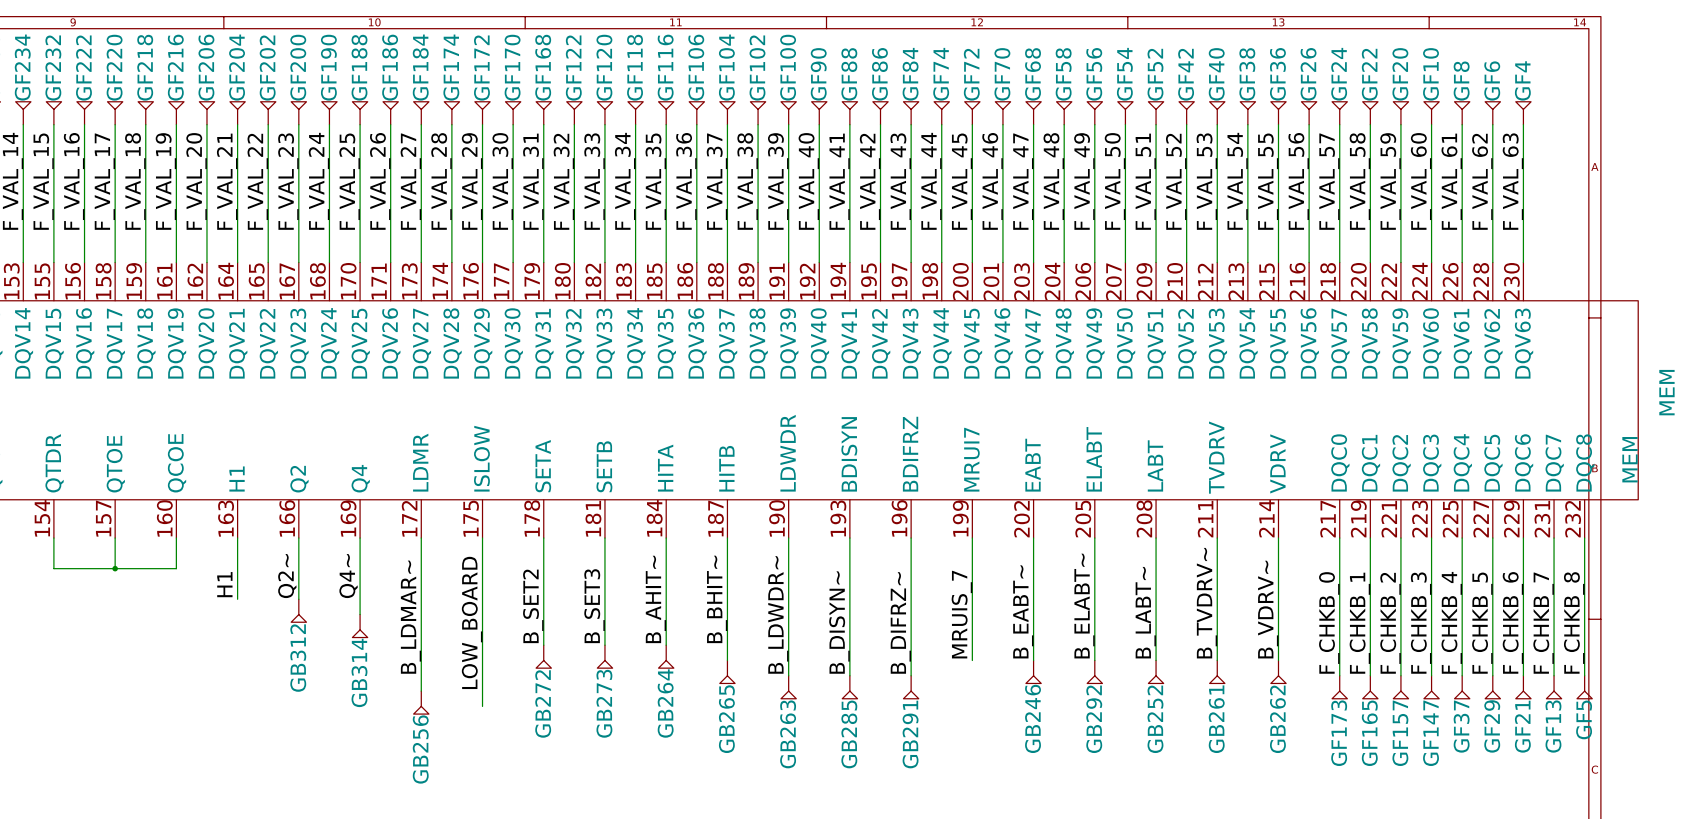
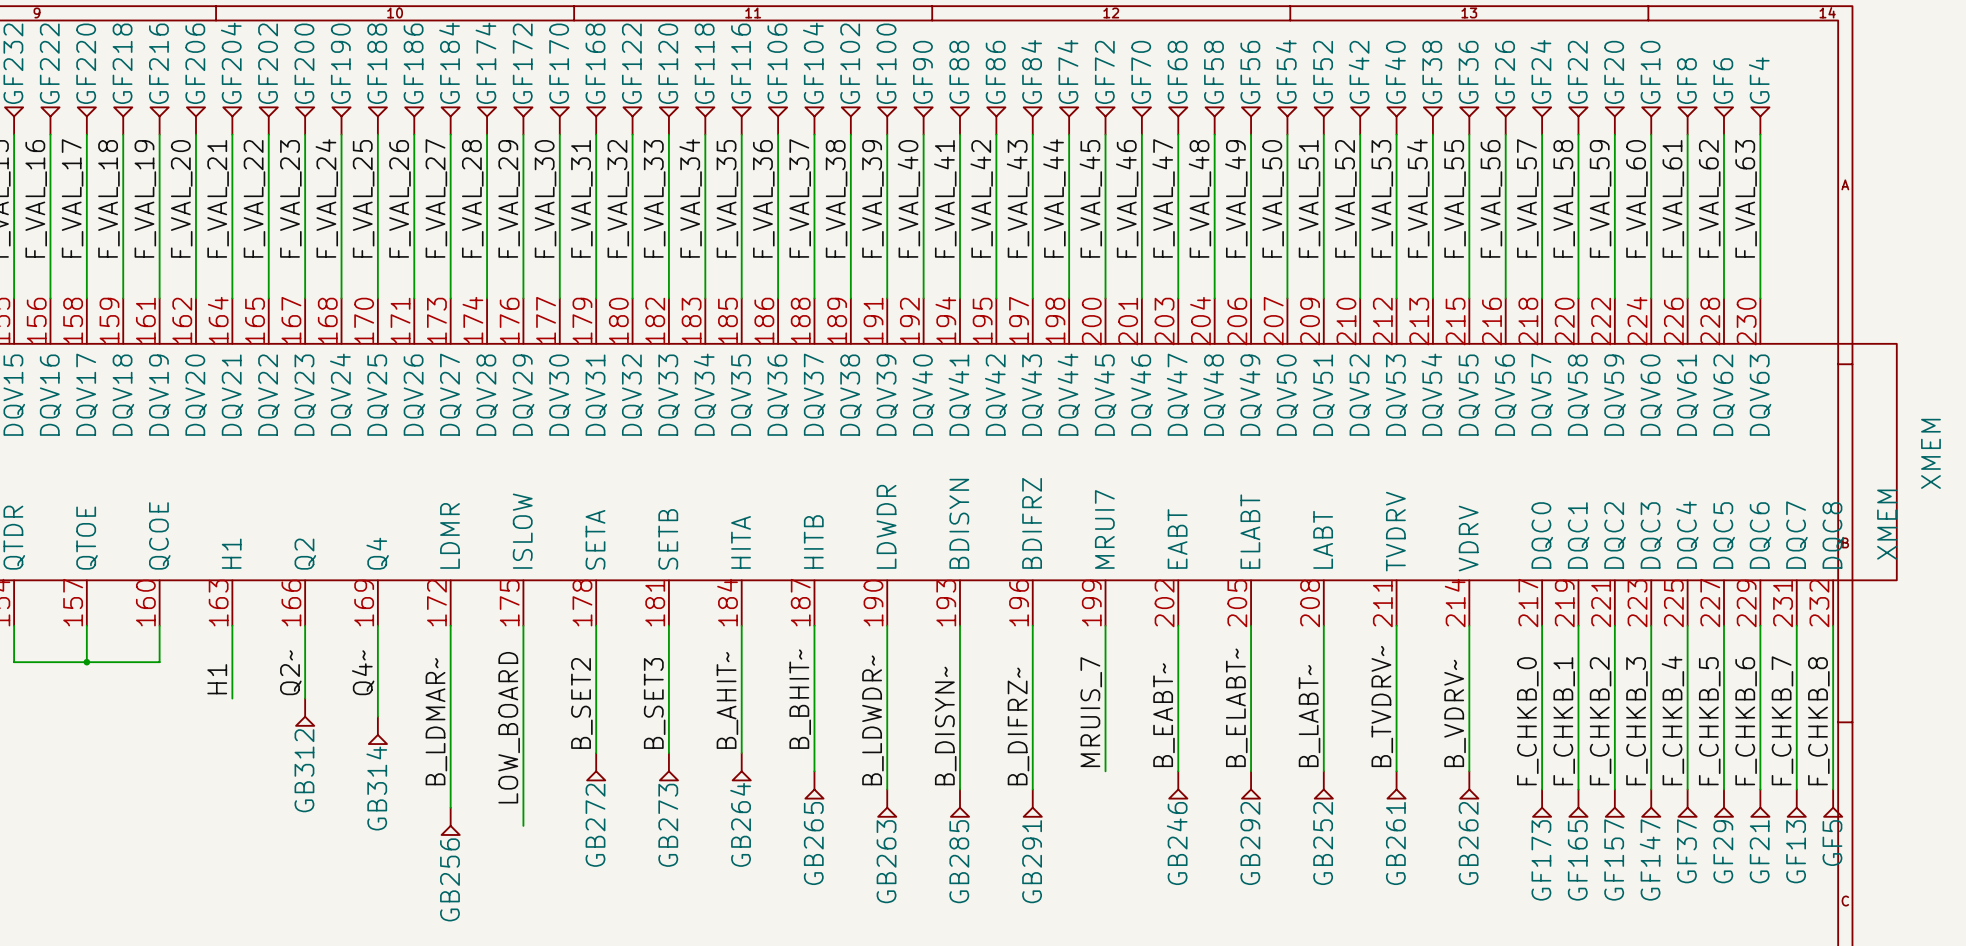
part text: MEM (1666, 392) -> XMEM (1930, 453)
part value: MEM (1629, 459) -> XMEM (1887, 524)

